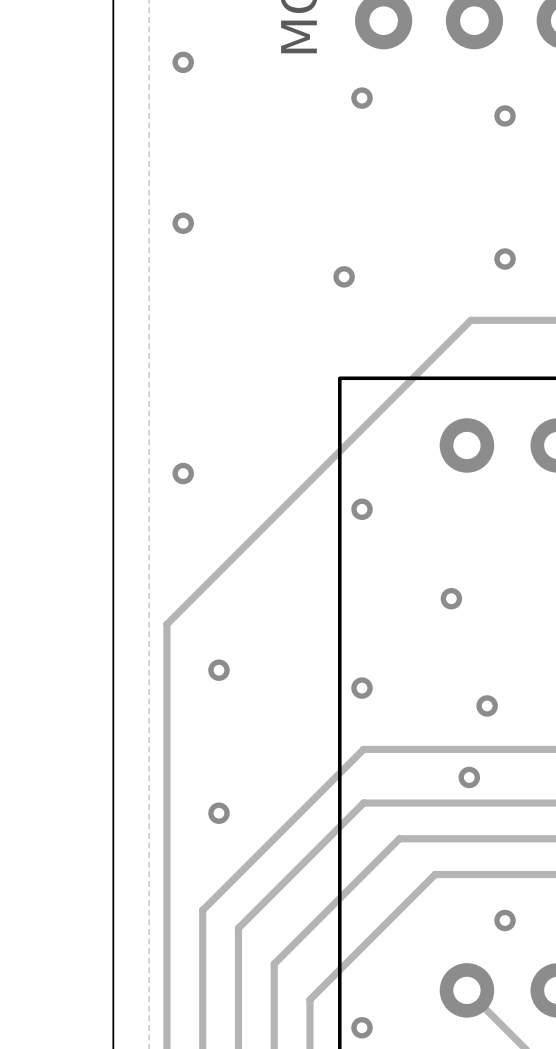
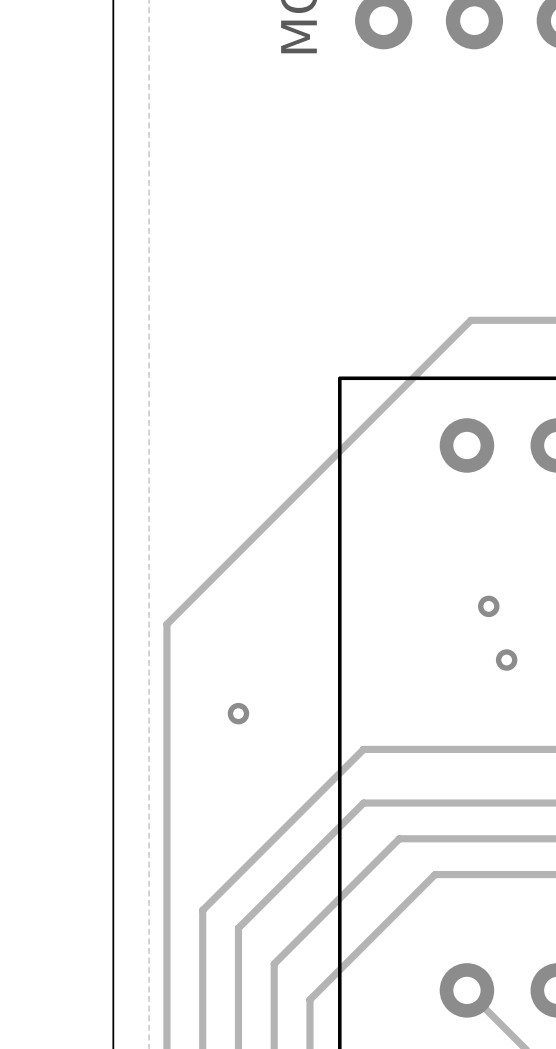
via: (183, 62) -> none
via: (362, 98) -> none
via: (505, 115) -> none
via: (183, 223) -> none
via: (505, 259) -> none
via: (344, 276) -> none
via: (183, 473) -> none
via: (362, 509) -> none
via position: (451, 598) -> (488, 606)
via: none -> (506, 660)
via position: (218, 670) -> (238, 713)
via: (362, 688) -> none
via: (487, 705) -> none
via: (469, 777) -> none
via: (218, 813) -> none
via: (505, 920) -> none
via: (362, 1027) -> none

